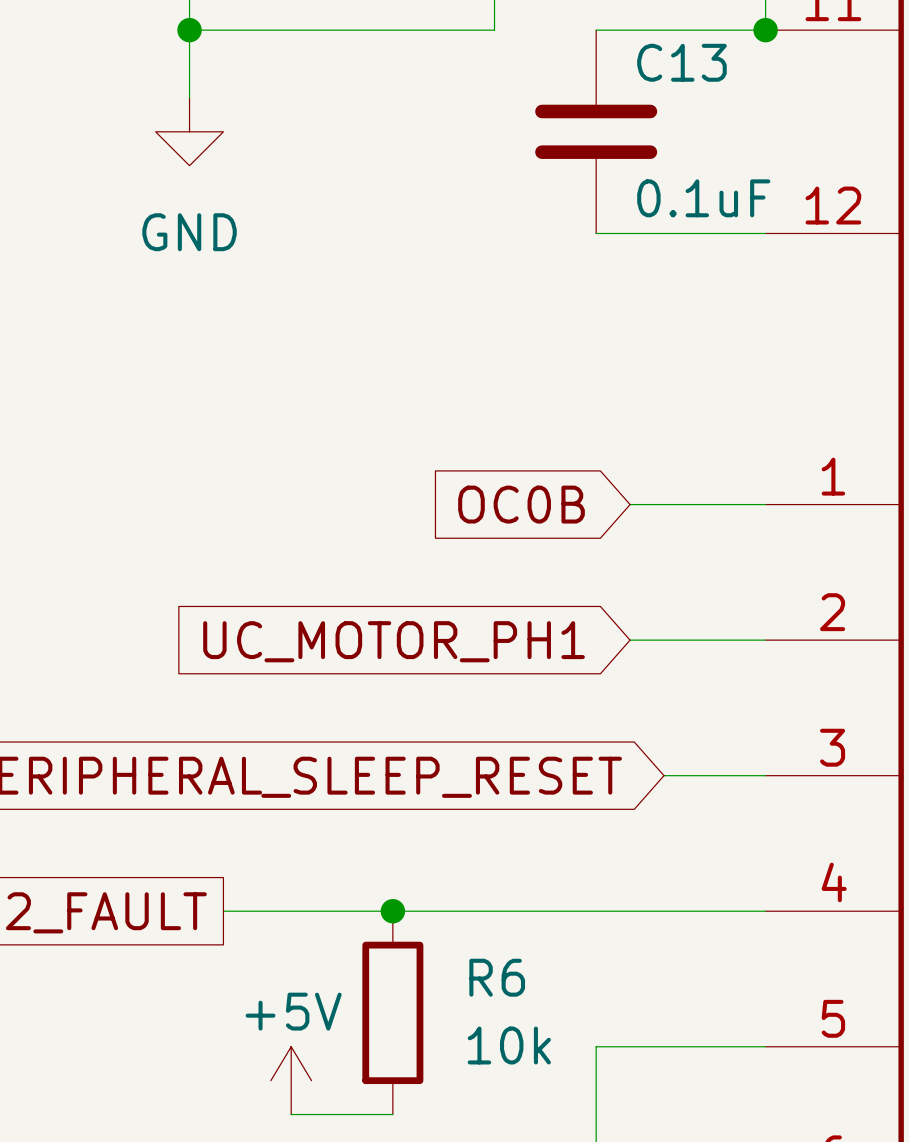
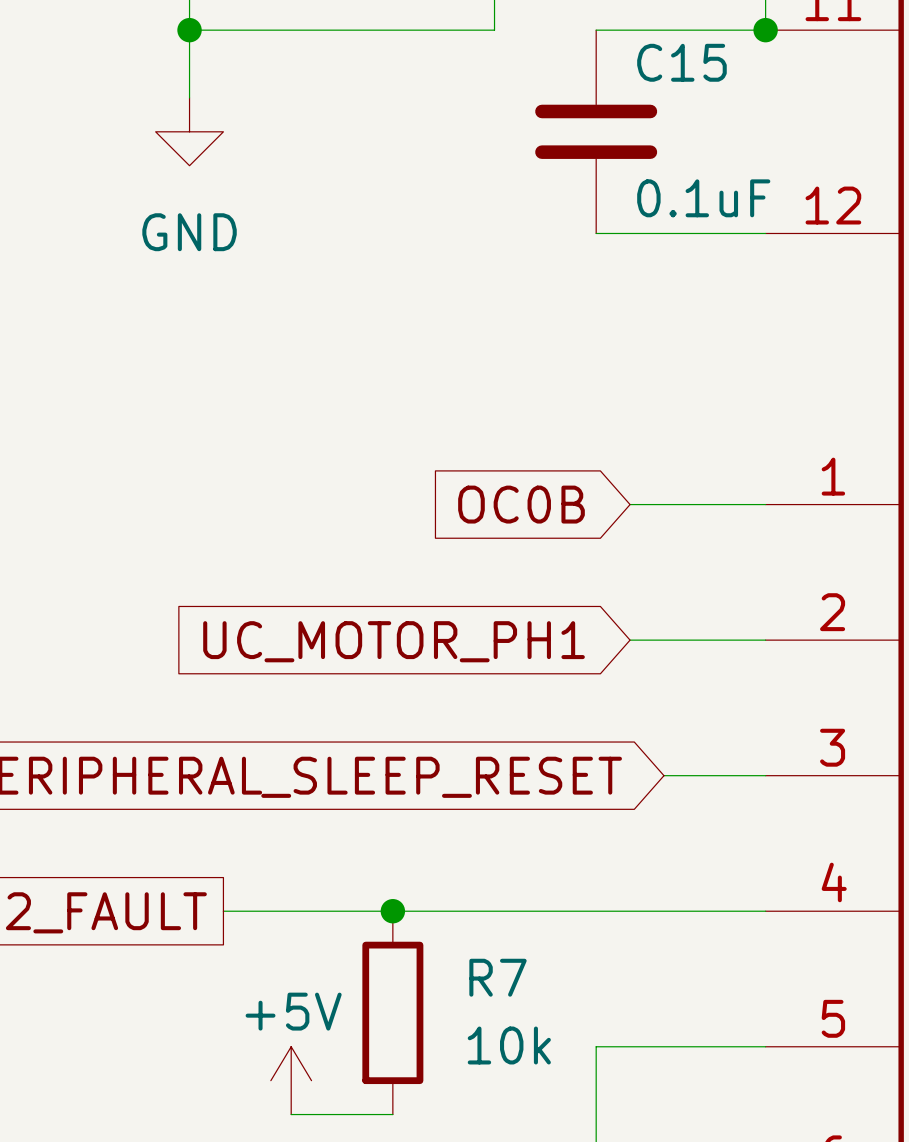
C13 name: C13 (681, 62) -> C15 (681, 62)
R6 name: R6 (497, 977) -> R7 (498, 977)

